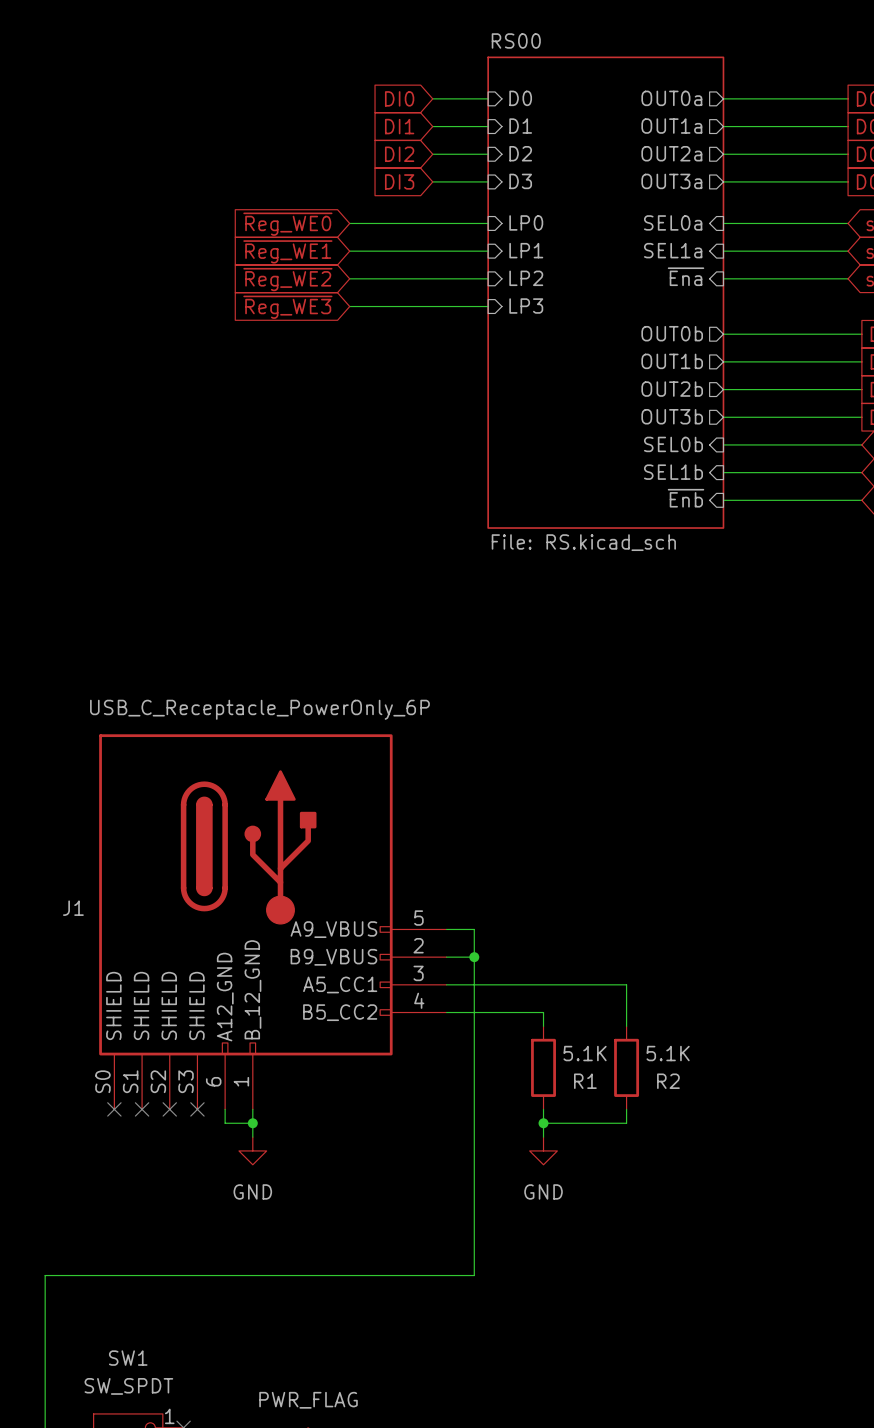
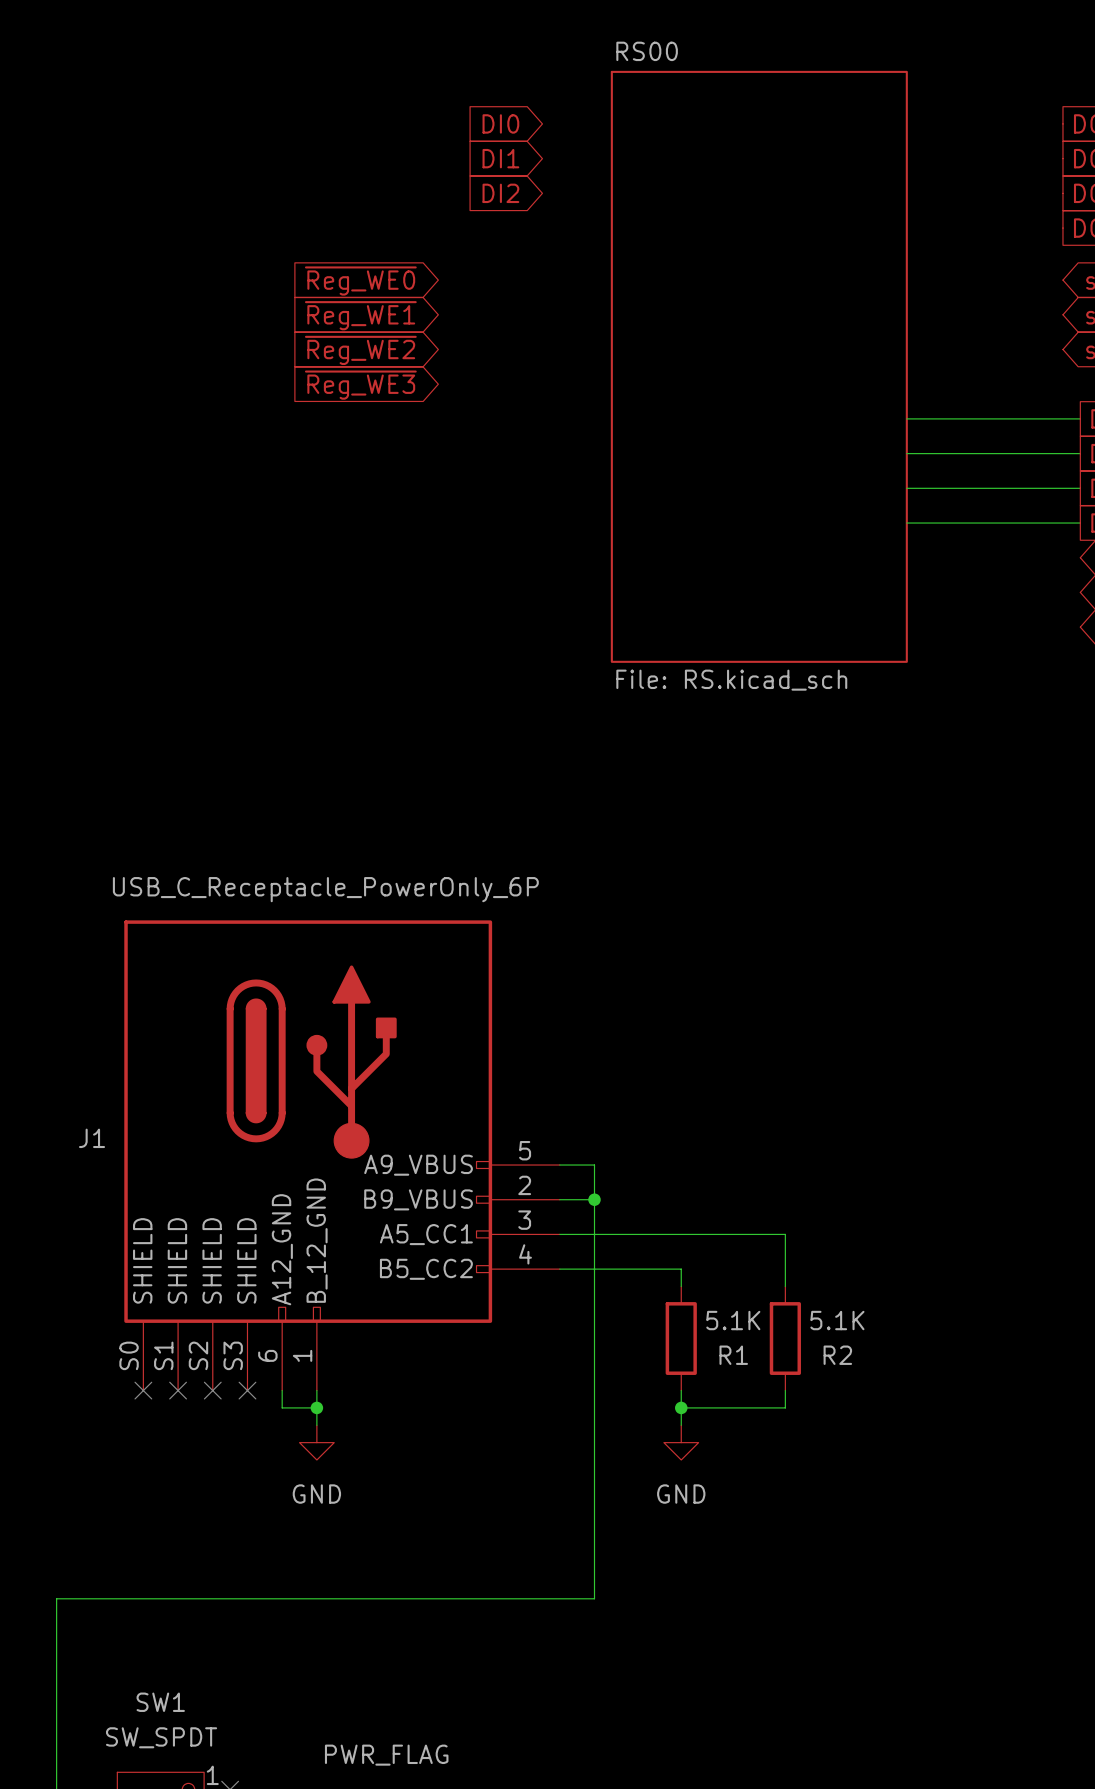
wire: (432, 98) (488, 98) -> none
sheet pin: D0 (520, 98) -> none
sheet pin: OUT0a (671, 98) -> none
wire: (723, 98) (848, 98) -> none
wire: (432, 126) (488, 126) -> none
sheet pin: D1 (520, 126) -> none
sheet pin: OUT1a (671, 126) -> none
wire: (723, 126) (848, 126) -> none
sheet pin: D2 (520, 153) -> none
sheet pin: OUT2a (671, 153) -> none
wire: (432, 154) (488, 154) -> none
wire: (723, 154) (848, 154) -> none
global label: DI3 (399, 181) -> none
wire: (432, 181) (488, 181) -> none
sheet pin: D3 (520, 181) -> none
sheet pin: OUT3a (671, 181) -> none
wire: (723, 181) (848, 181) -> none
sheet pin: LP0 (526, 222) -> none
sheet pin: SEL0a (673, 222) -> none
wire: (349, 223) (488, 223) -> none
wire: (723, 223) (848, 223) -> none
sheet pin: LP1 (526, 250) -> none
sheet pin: SEL1a (673, 250) -> none
wire: (349, 251) (488, 251) -> none
wire: (723, 251) (848, 251) -> none
sheet pin: ~{Ena} (686, 276) -> none
wire: (349, 278) (488, 278) -> none
sheet pin: LP2 (526, 278) -> none
wire: (723, 278) (848, 278) -> none
wire: (349, 306) (488, 306) -> none
sheet pin: LP3 (526, 306) -> none
sheet pin: OUT0b (672, 333) -> none
sheet pin: OUT1b (672, 361) -> none
sheet pin: OUT2b (672, 389) -> none
sheet pin: OUT3b (672, 416) -> none
sheet pin: SEL0b (673, 444) -> none
wire: (723, 444) (861, 444) -> none
sheet pin: SEL1b (673, 472) -> none
wire: (723, 472) (861, 472) -> none
sheet pin: ~{Enb} (686, 498) -> none
wire: (723, 500) (861, 500) -> none

